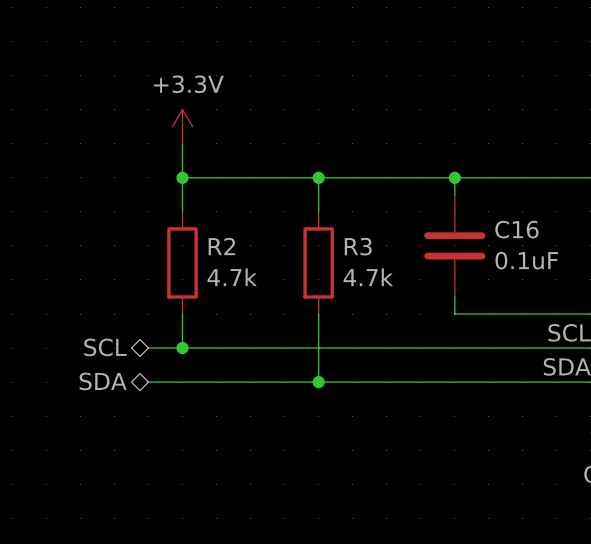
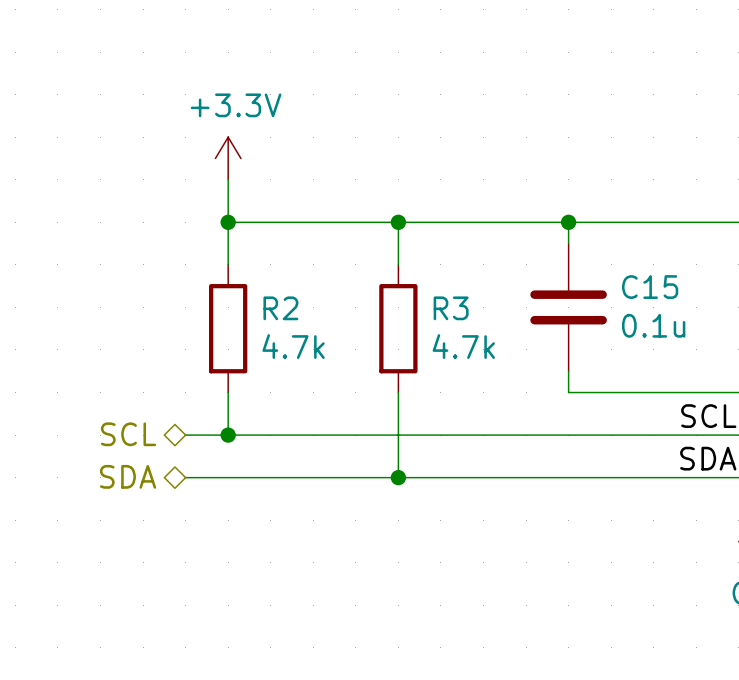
C16 name: C16 (516, 229) -> C15 (650, 287)
C16 value: 0.1uF (526, 260) -> 0.1u (653, 325)

